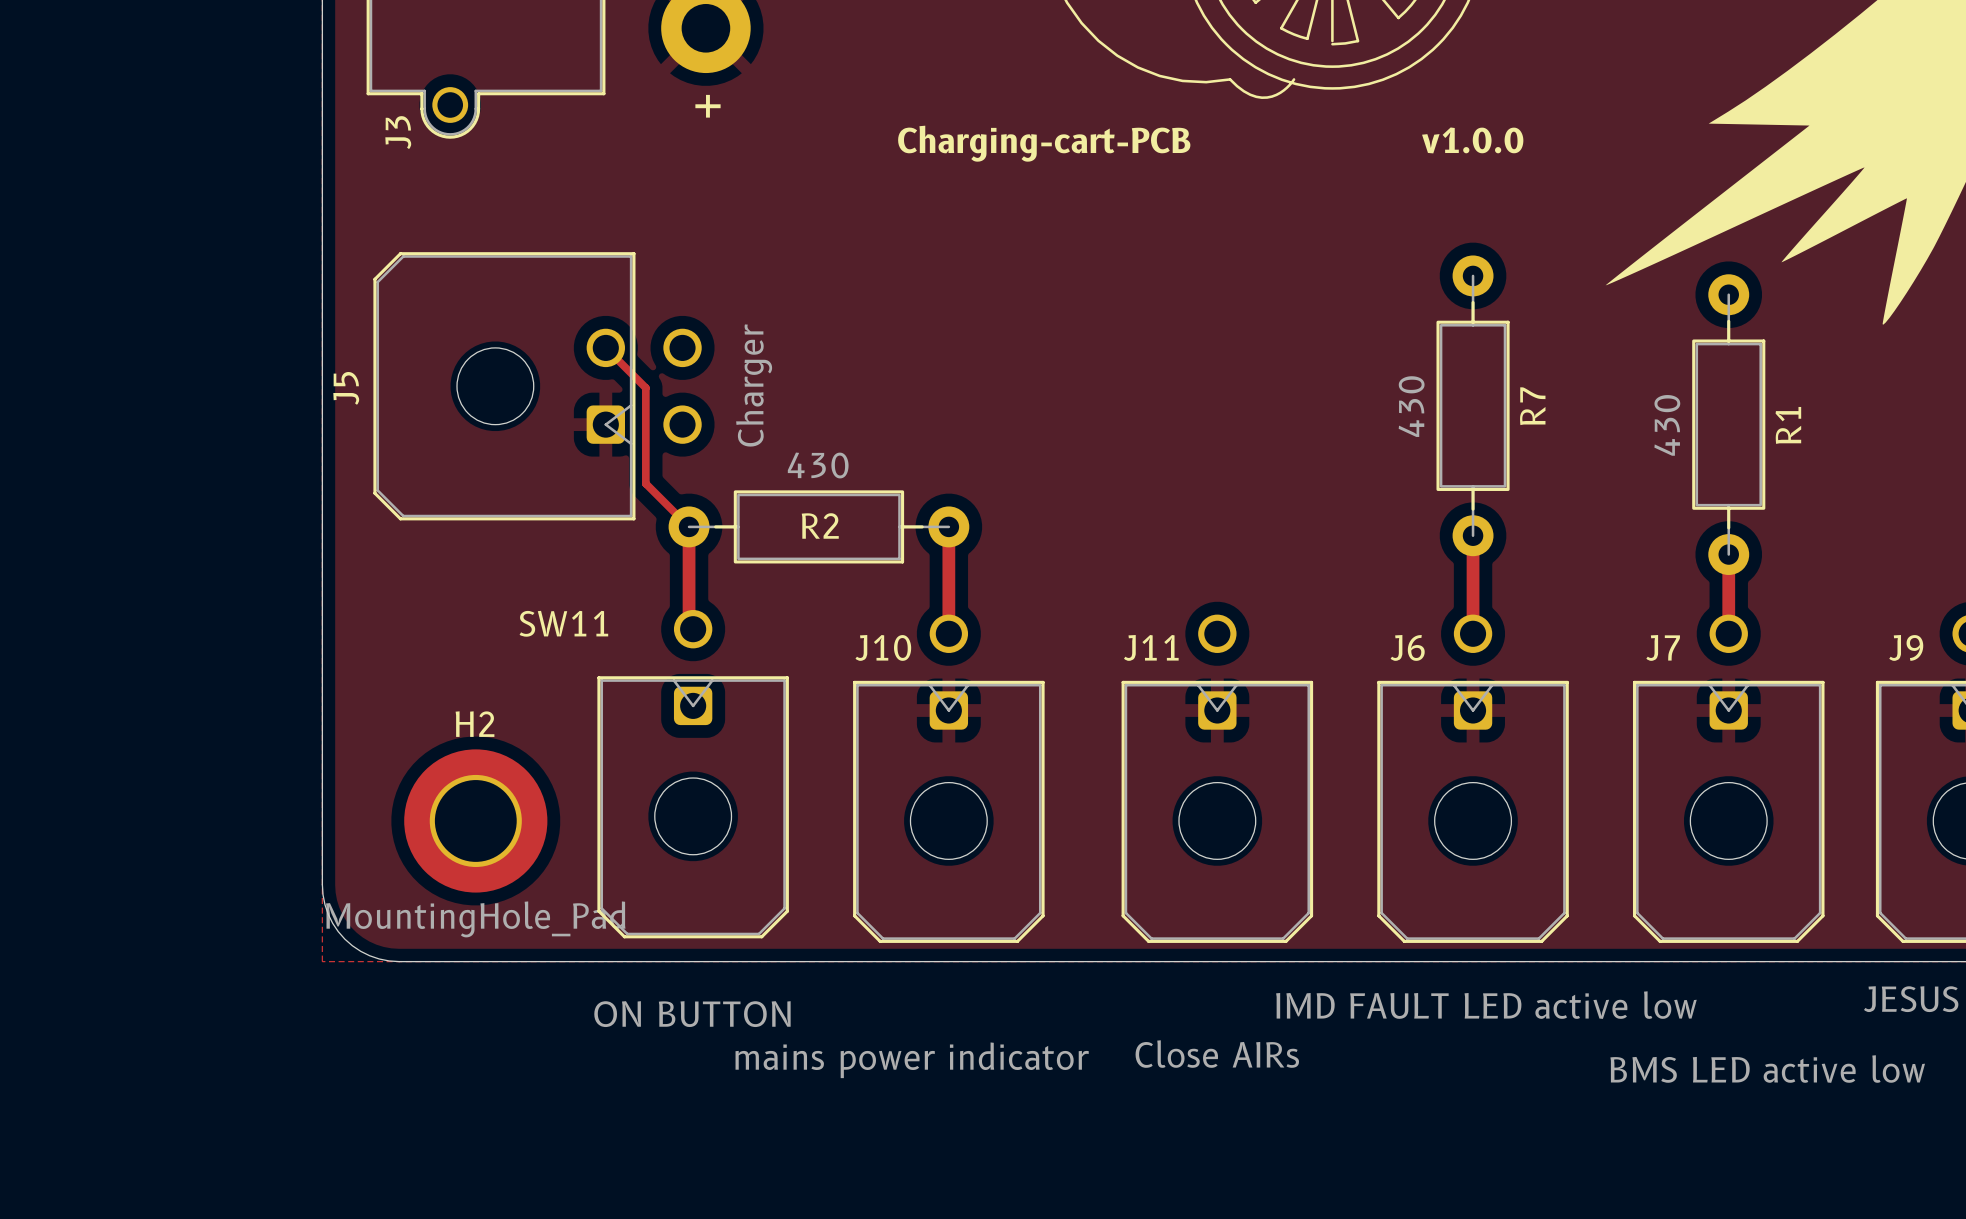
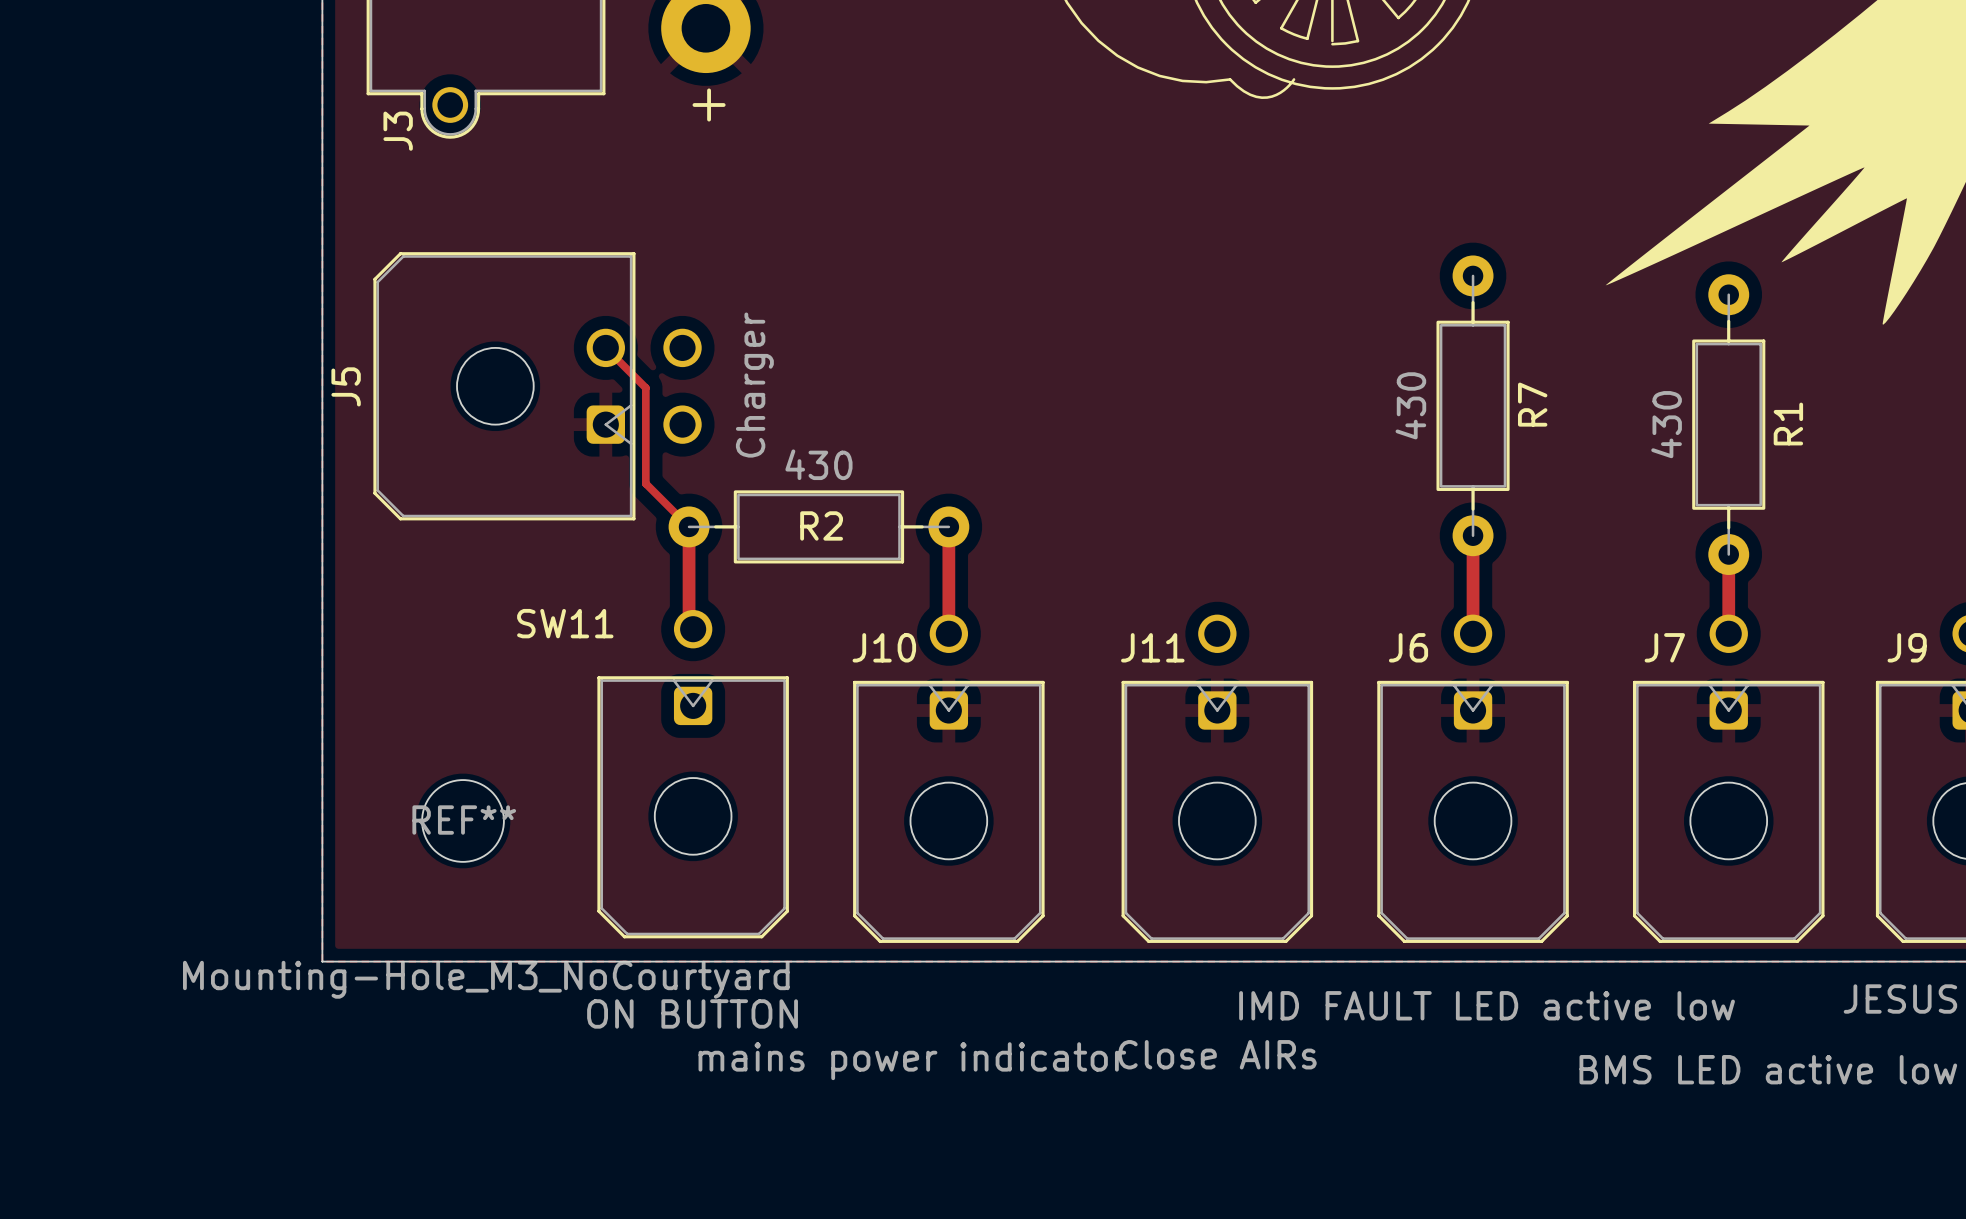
text: v1.0.0 (1472, 140) -> none
text: Charging-cart-PCB (1044, 143) -> none
REF**: none -> Mounting-Hole_M3_NoCourtyard (463, 820)
H2: MountingHole_Pad (475, 820) -> none
board edge: (322, 884) (328, 914) (344, 939) (369, 955) (399, 961) -> (322, 884) (322, 961) (399, 961)

